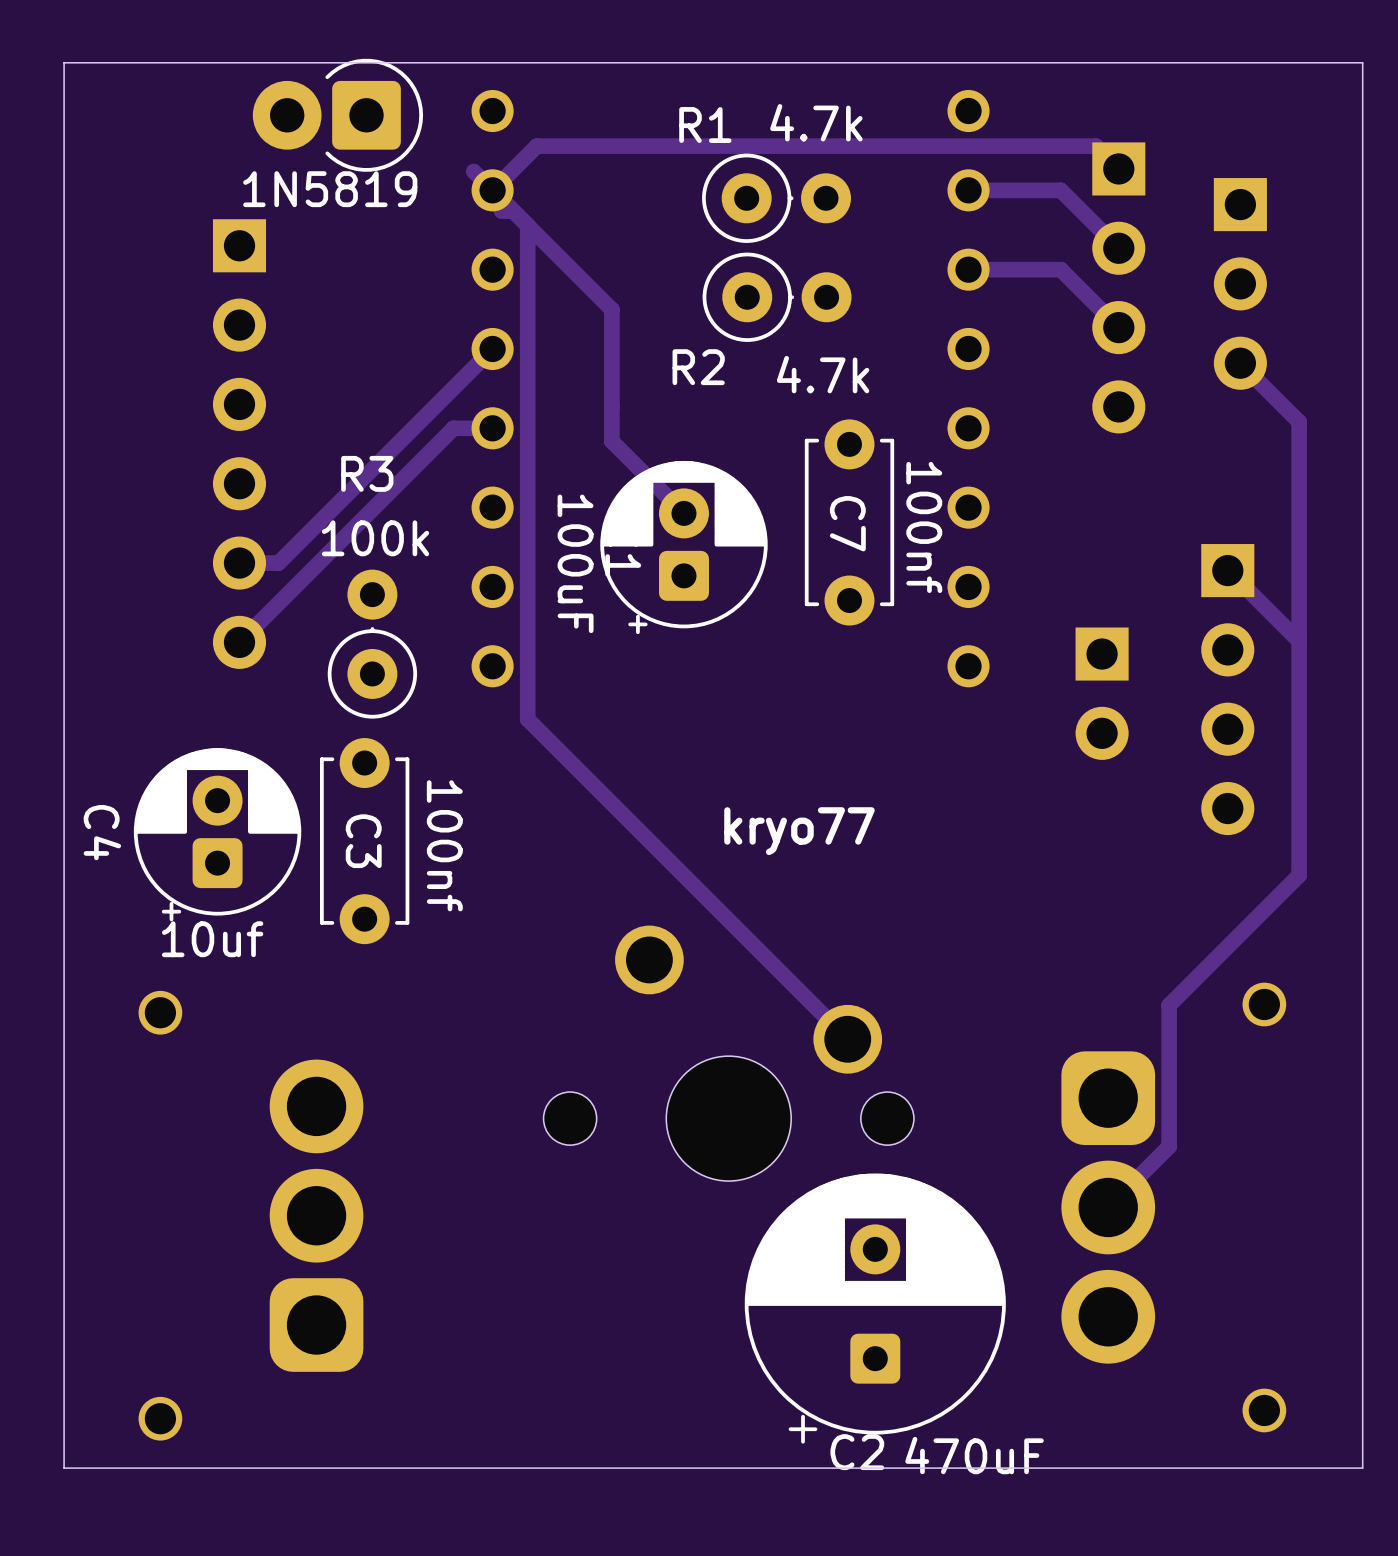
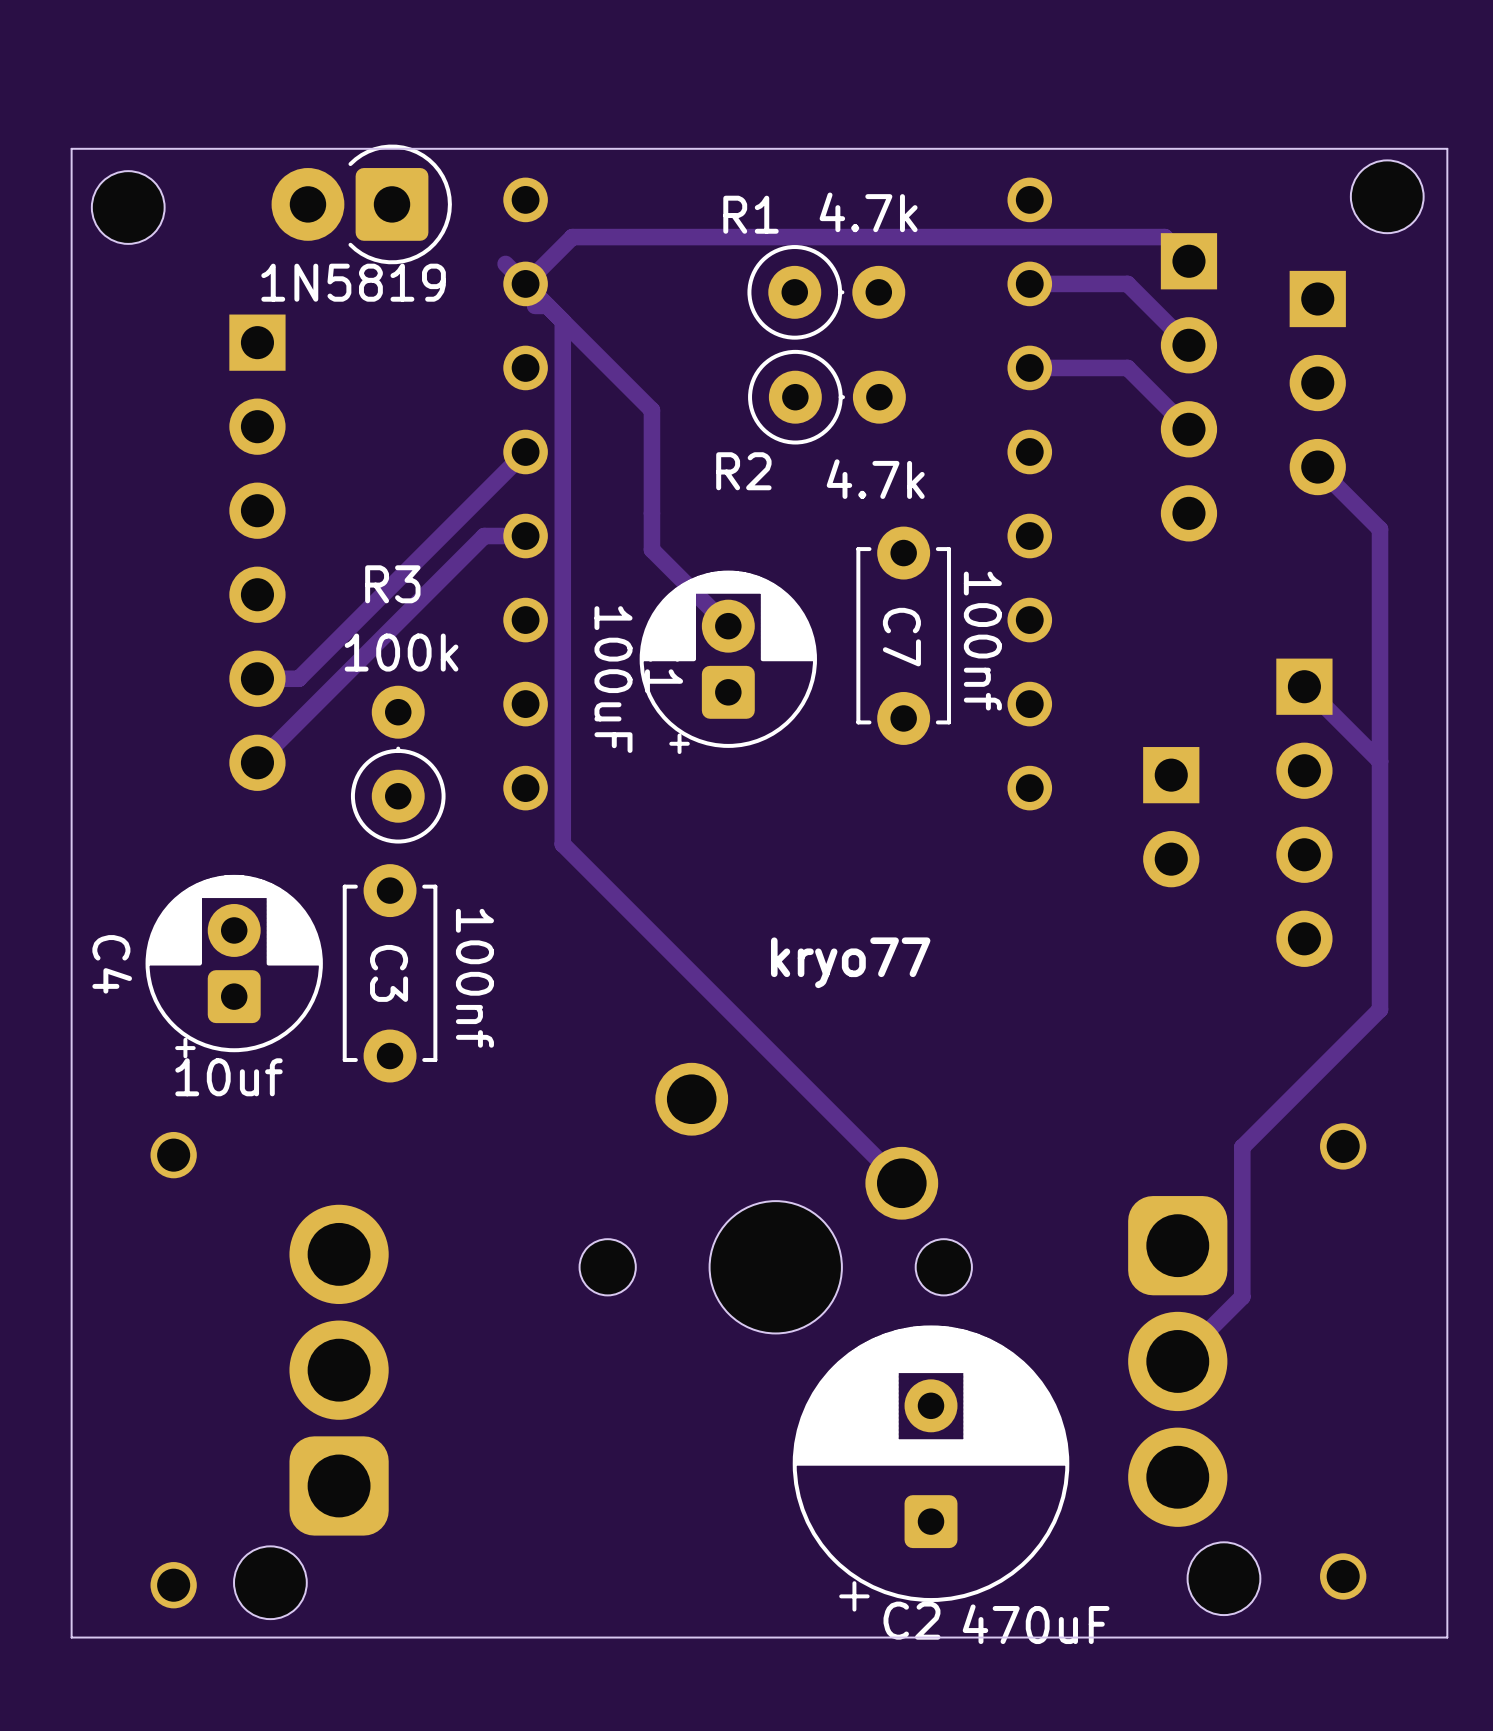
part: none -> (1387, 196)
part: none -> (128, 207)
part: none -> (1223, 1578)
part: none -> (270, 1582)

